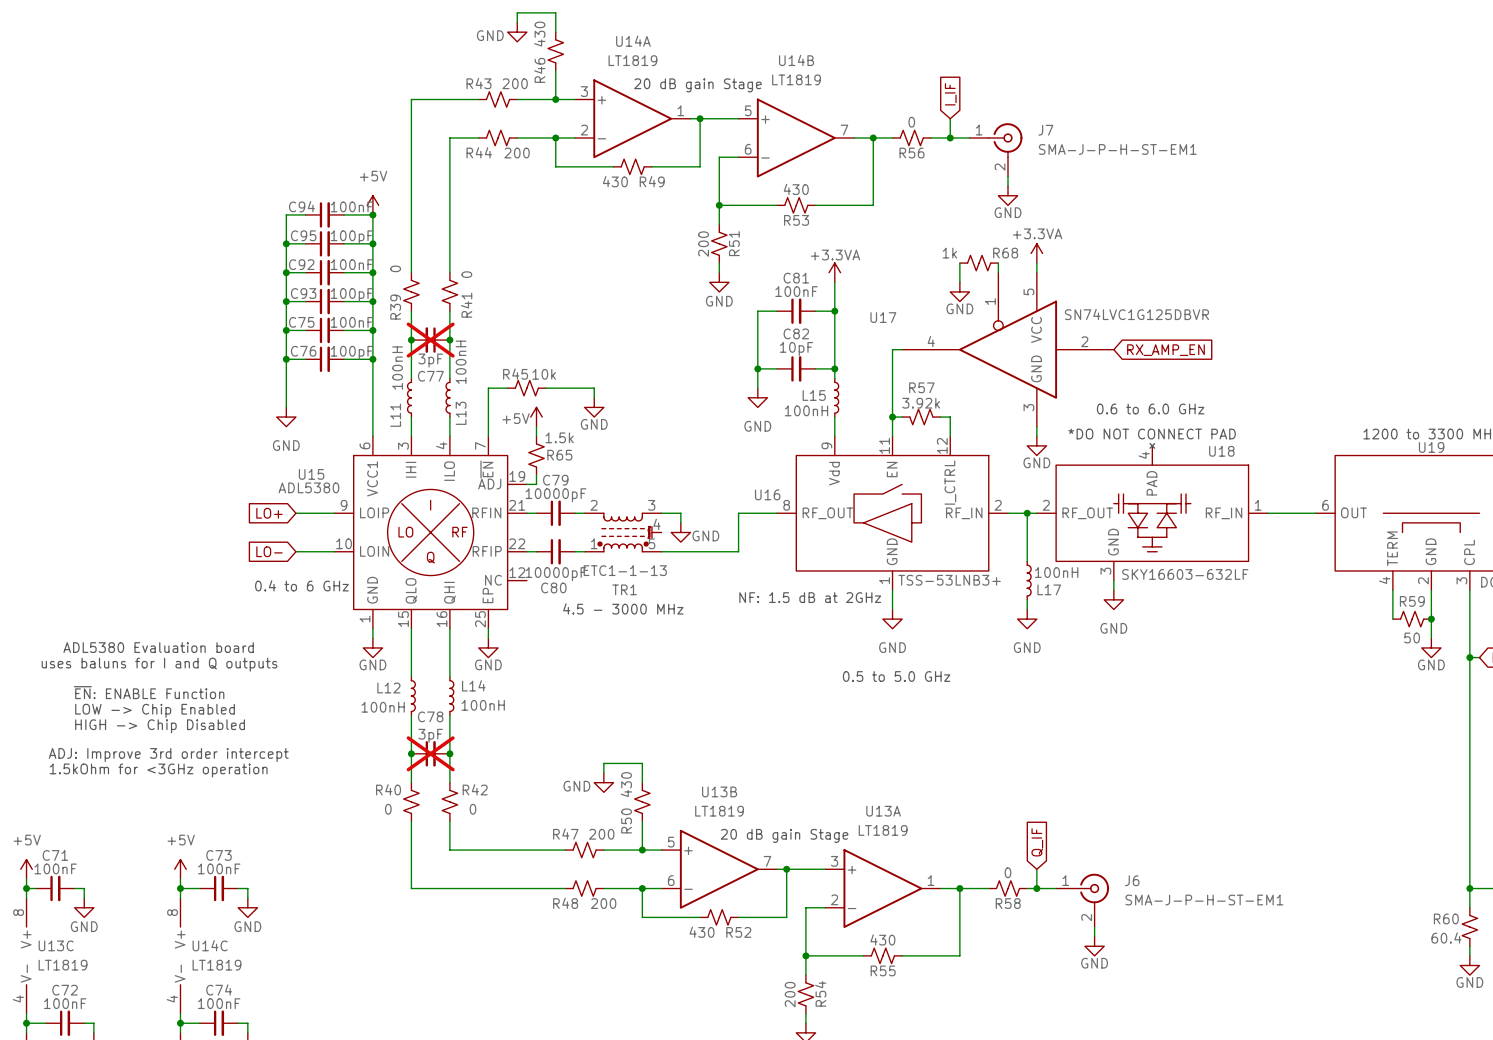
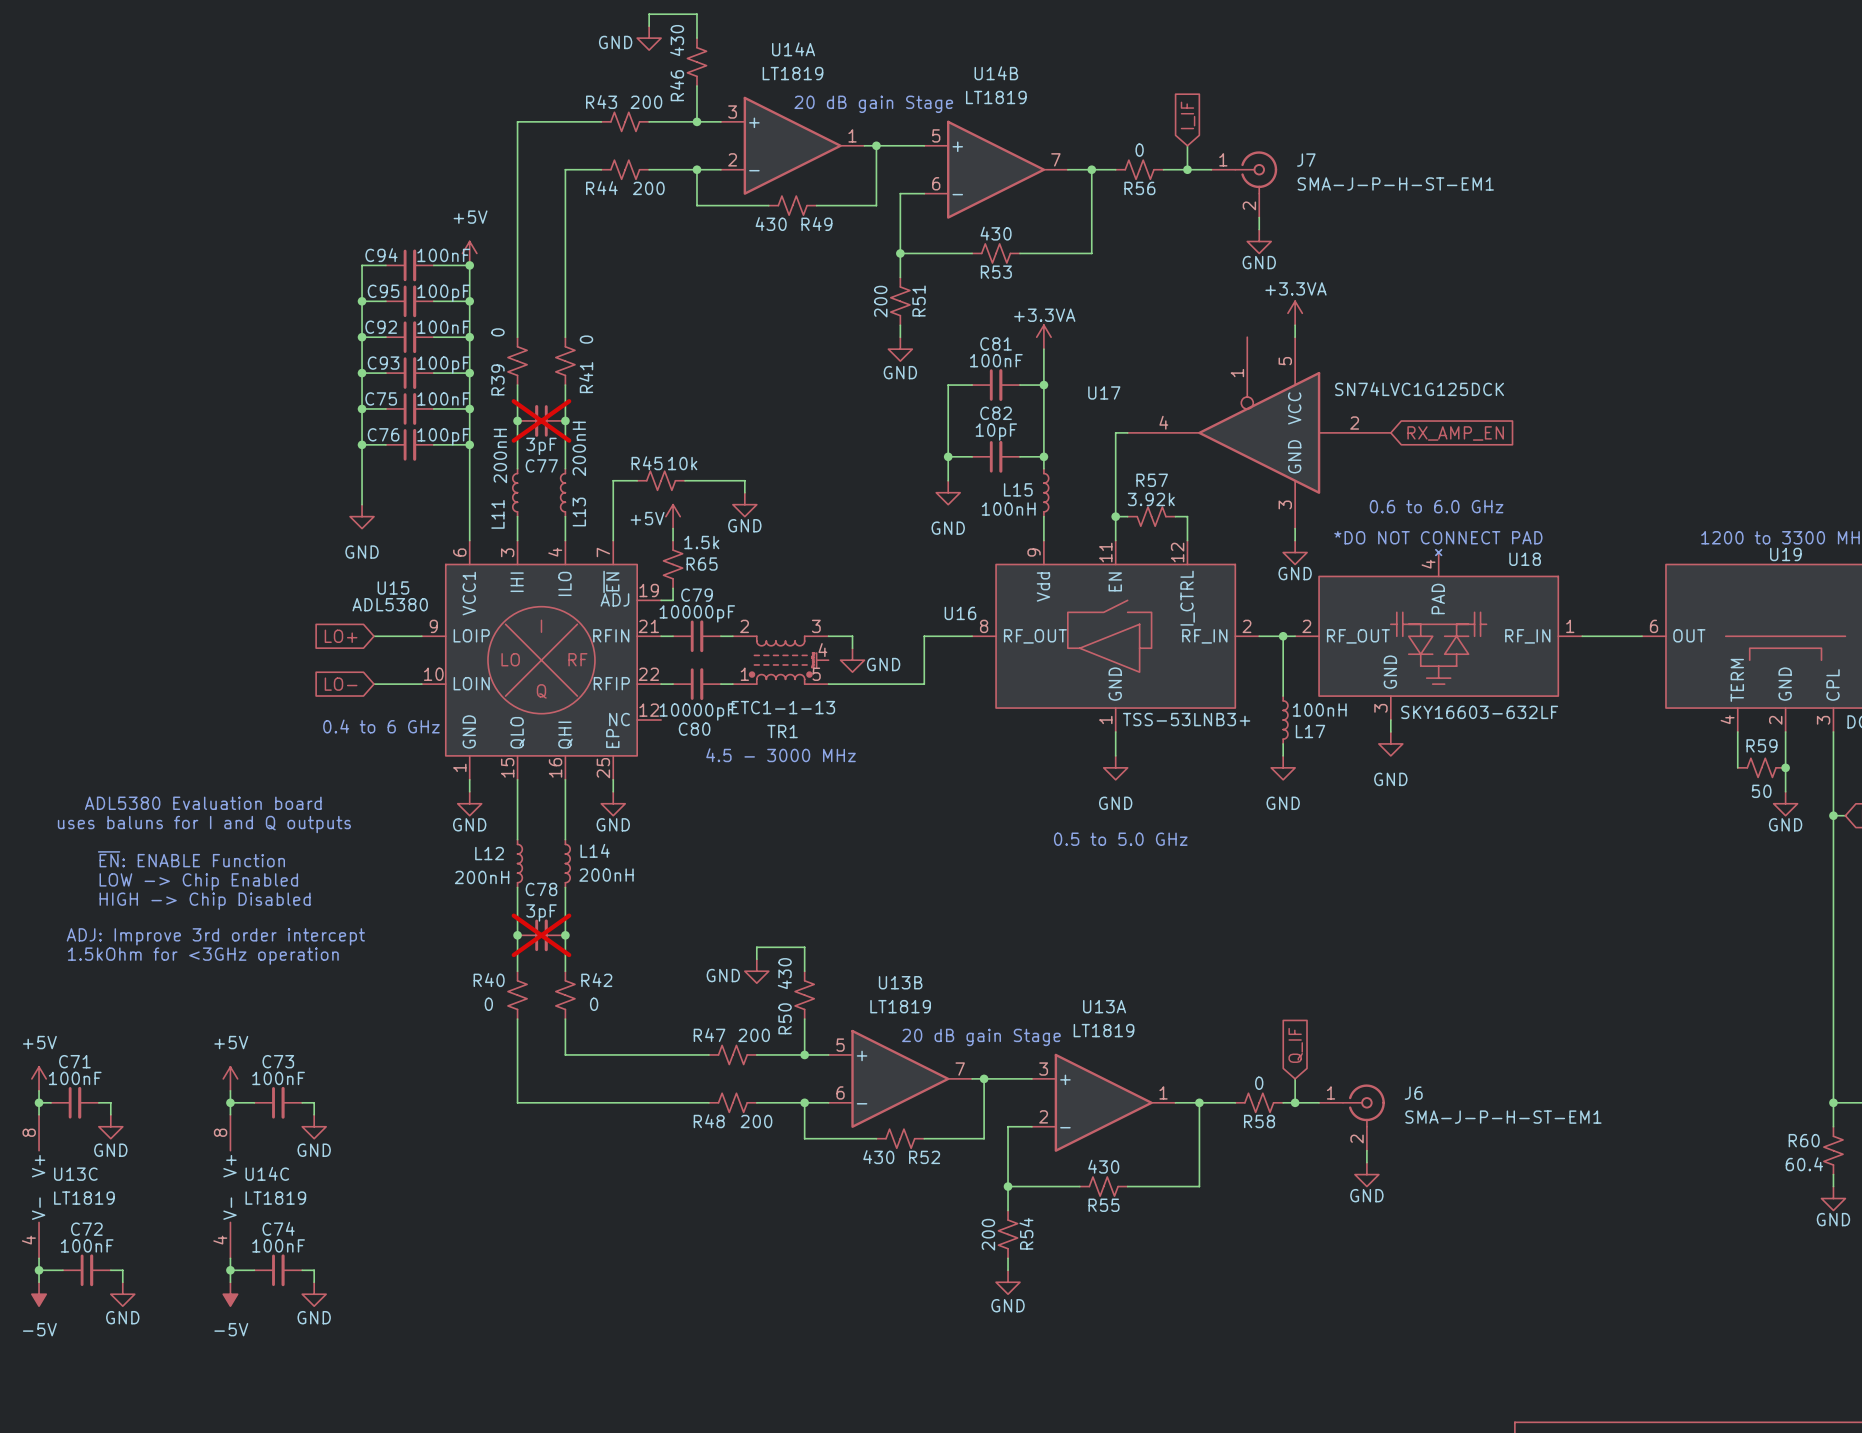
wire: (959, 263) (959, 282) -> none
R68: 1k (979, 263) -> none
wire: (998, 263) (998, 272) -> none
power symbol: GND (959, 291) -> none
U17 value: SN74LVC1G125DBVR (1136, 314) -> SN74LVC1G125DCK (1419, 389)
L13 value: 100nH (461, 362) -> 200nH (579, 448)
L11 value: 100nH (397, 368) -> 200nH (500, 456)
text: NF: 1.5 dB at 2GHz (810, 597) -> none
L14 value: 100nH (483, 705) -> 200nH (606, 875)
L12 value: 100nH (383, 707) -> 200nH (482, 877)

